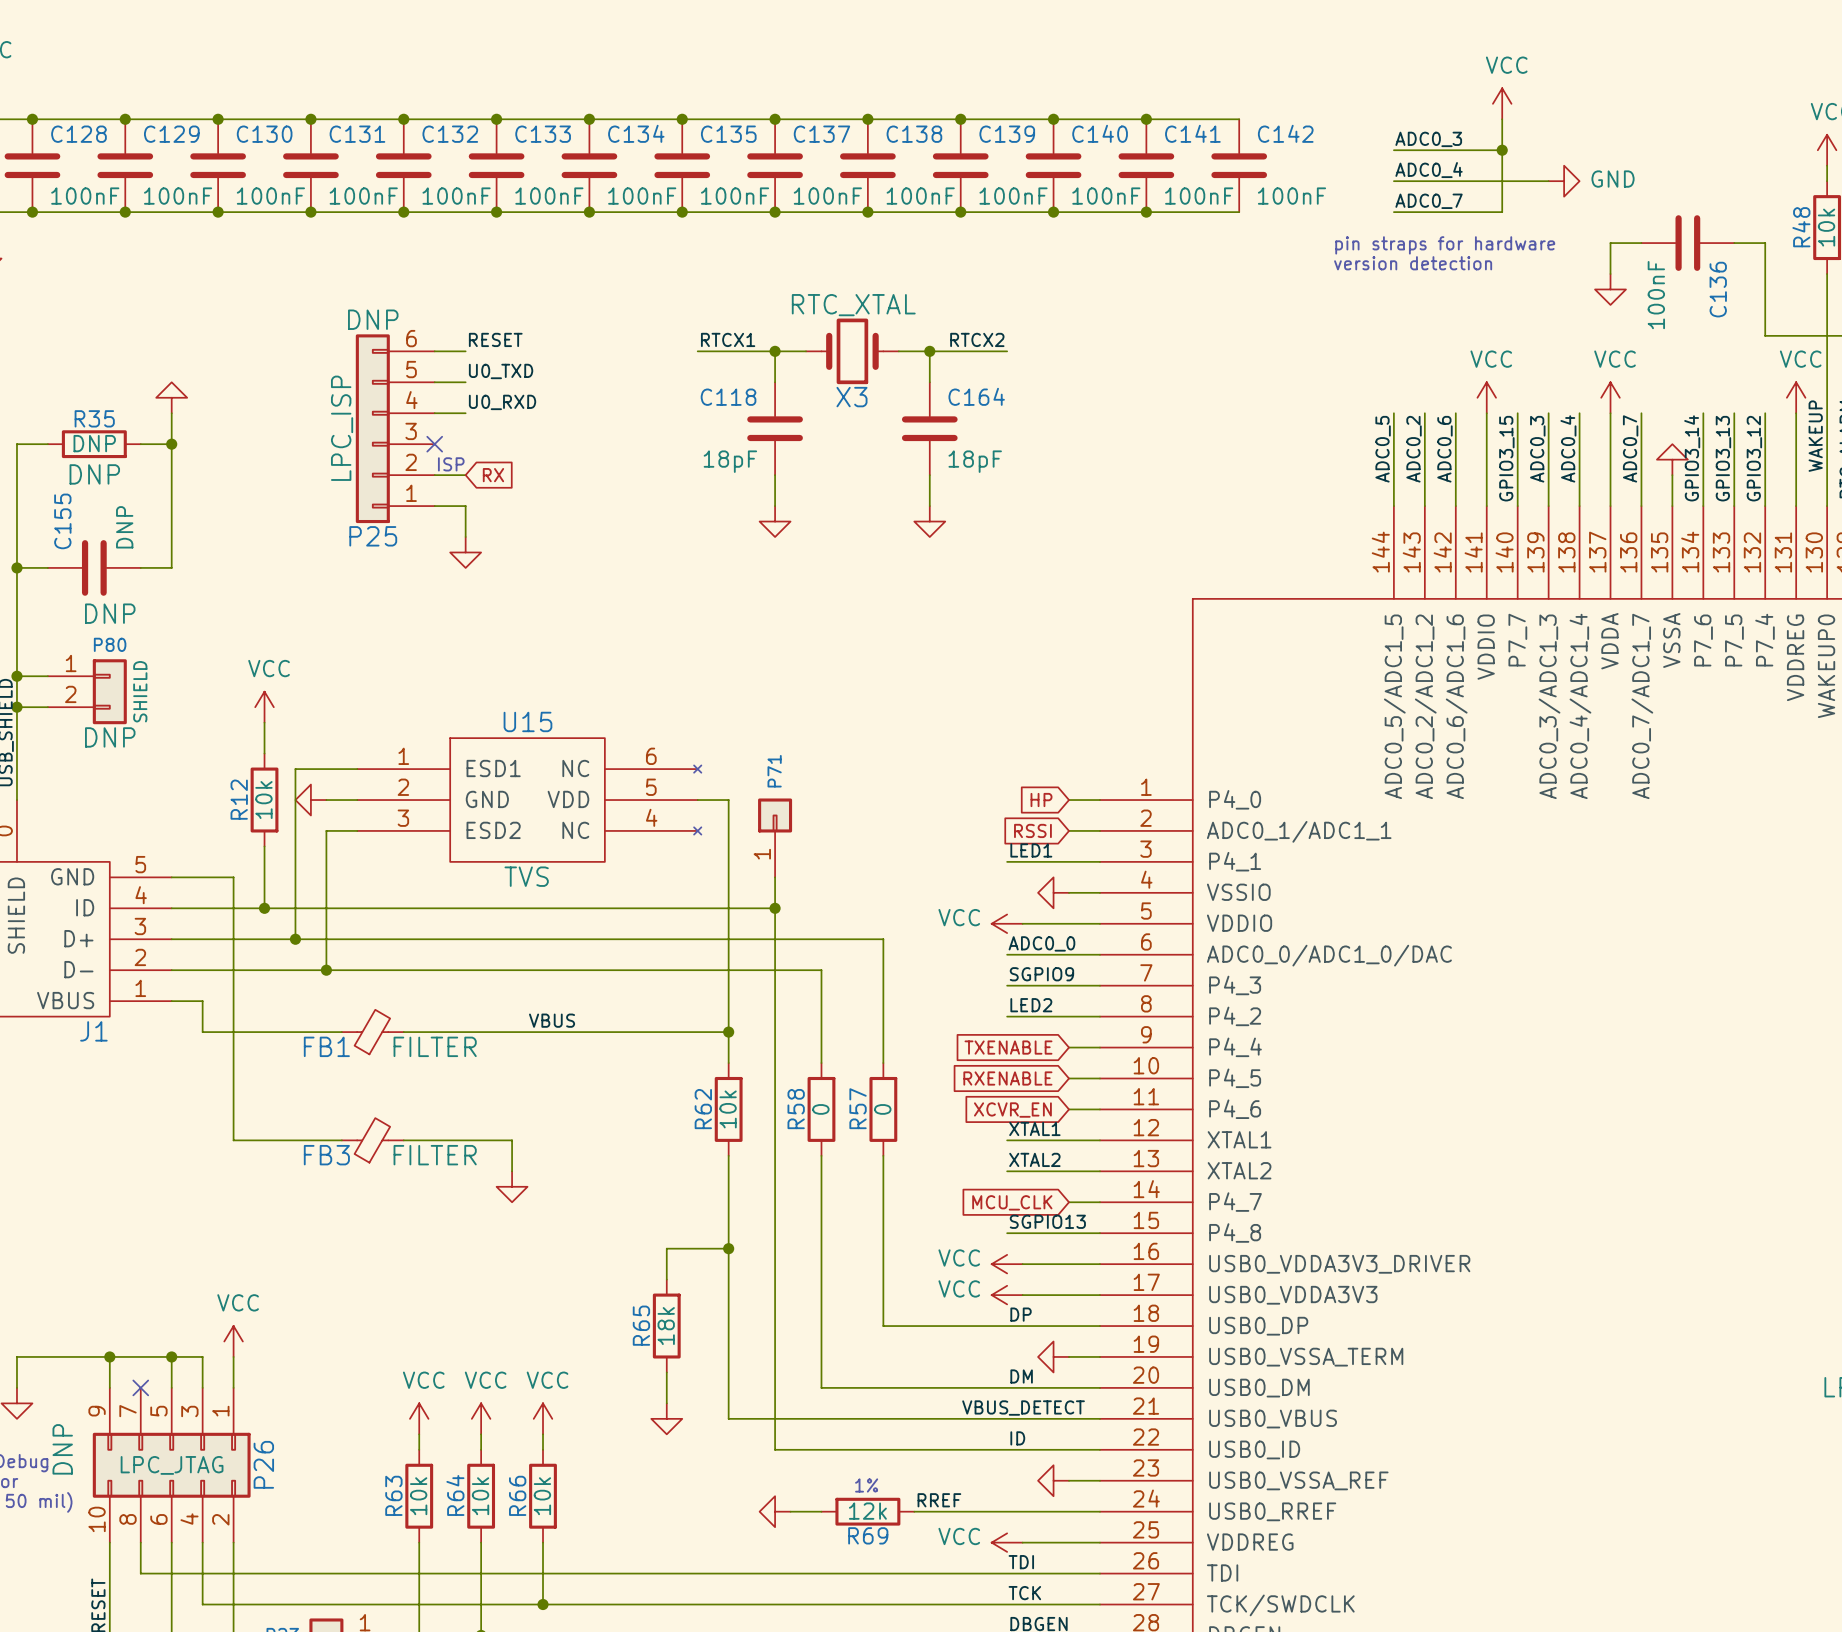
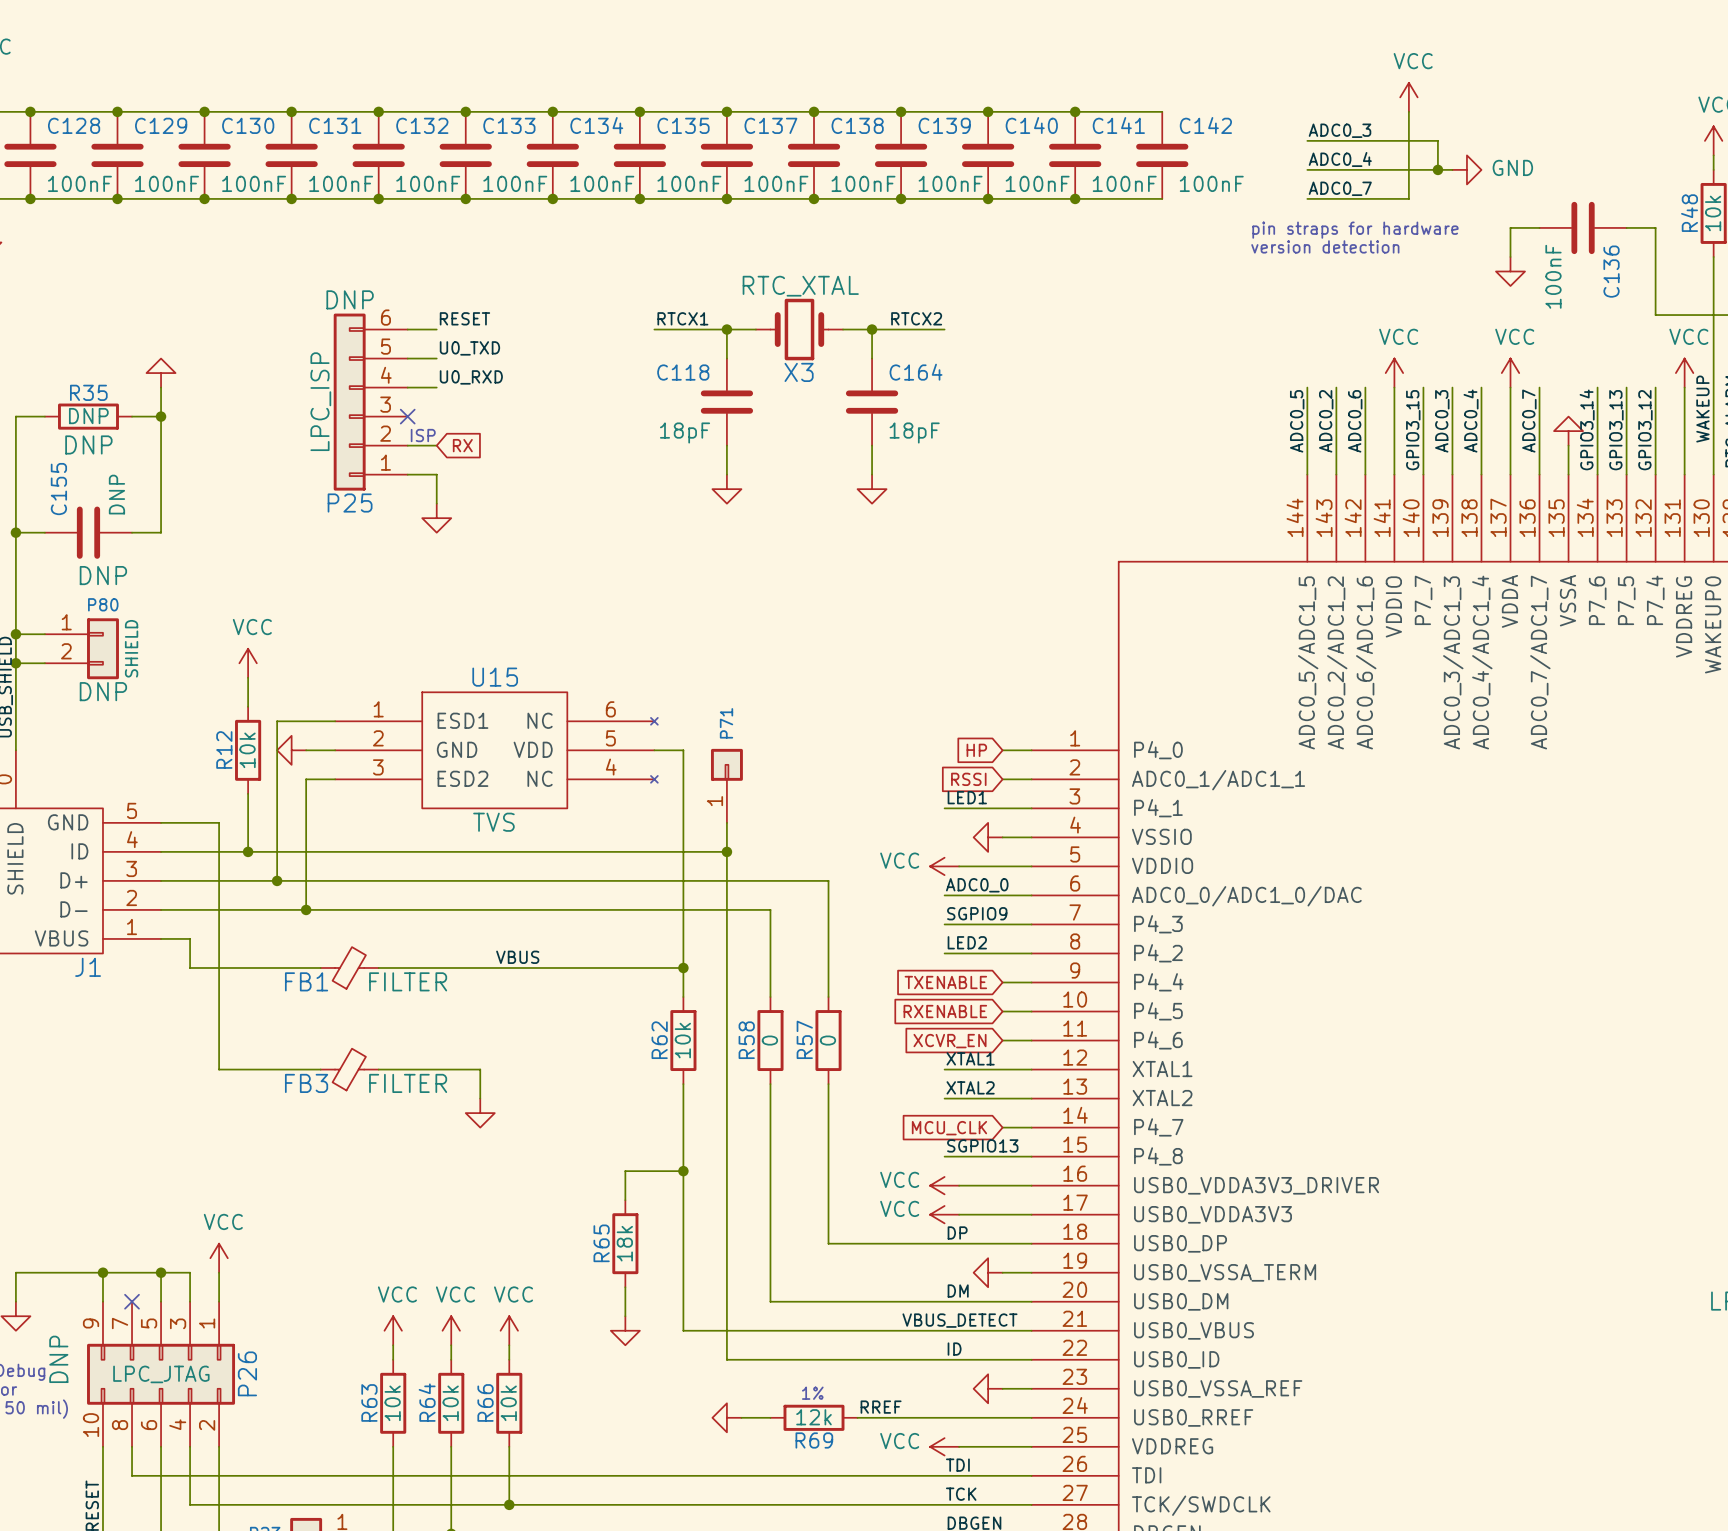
wire: none -> (1408, 140) (1437, 140) (1437, 169)
junction position: (1502, 150) -> (1437, 169)

